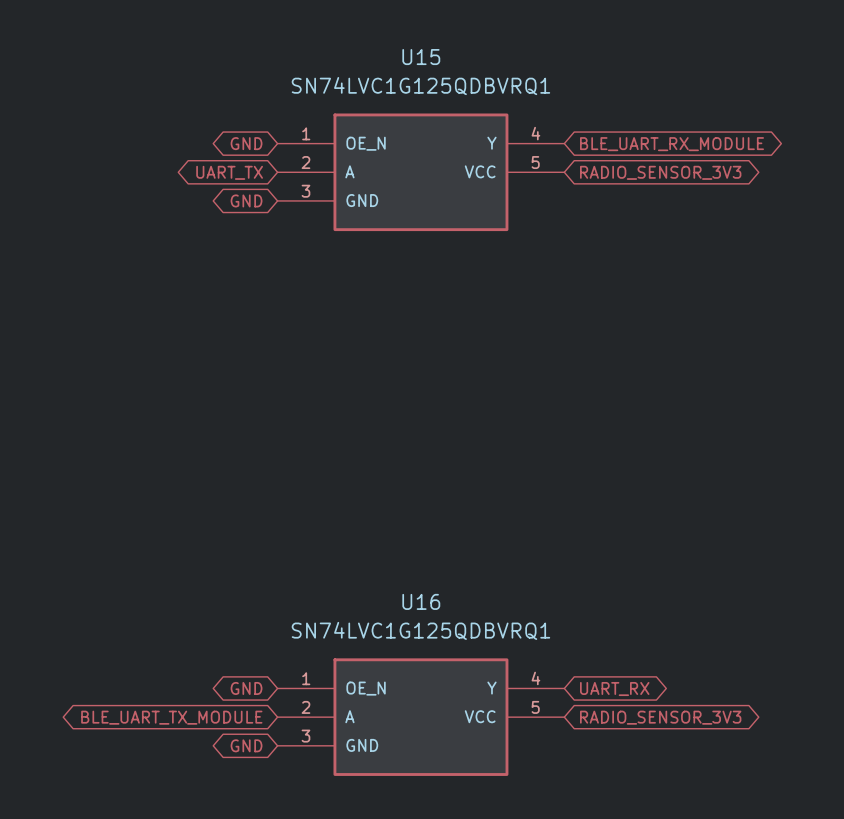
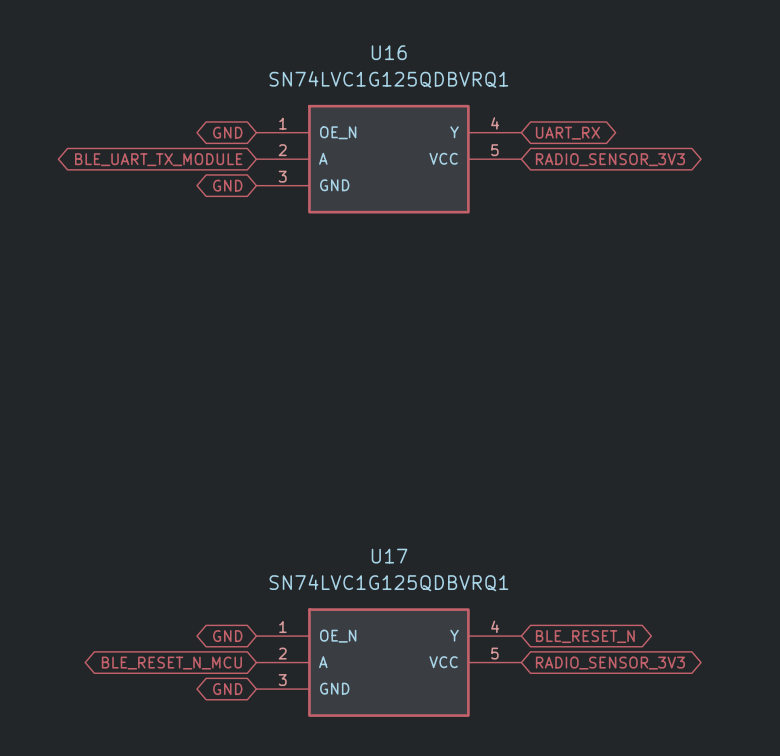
U15 name: U15 (421, 57) -> U16 (389, 52)
global label: BLE_UART_RX_MODULE (671, 144) -> UART_RX (567, 133)
global label: UART_TX (229, 172) -> BLE_UART_TX_MODULE (158, 159)
U16 name: U16 (421, 601) -> U17 (389, 556)
global label: UART_RX (614, 689) -> BLE_RESET_N (585, 636)
global label: BLE_UART_TX_MODULE (171, 717) -> BLE_RESET_N_MCU (171, 663)

